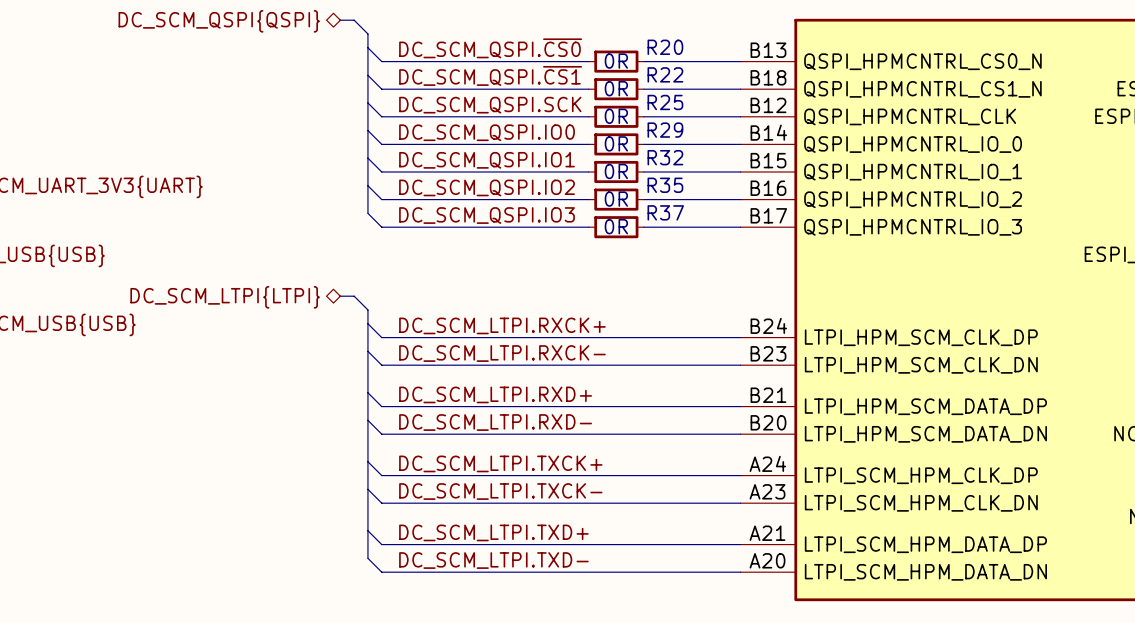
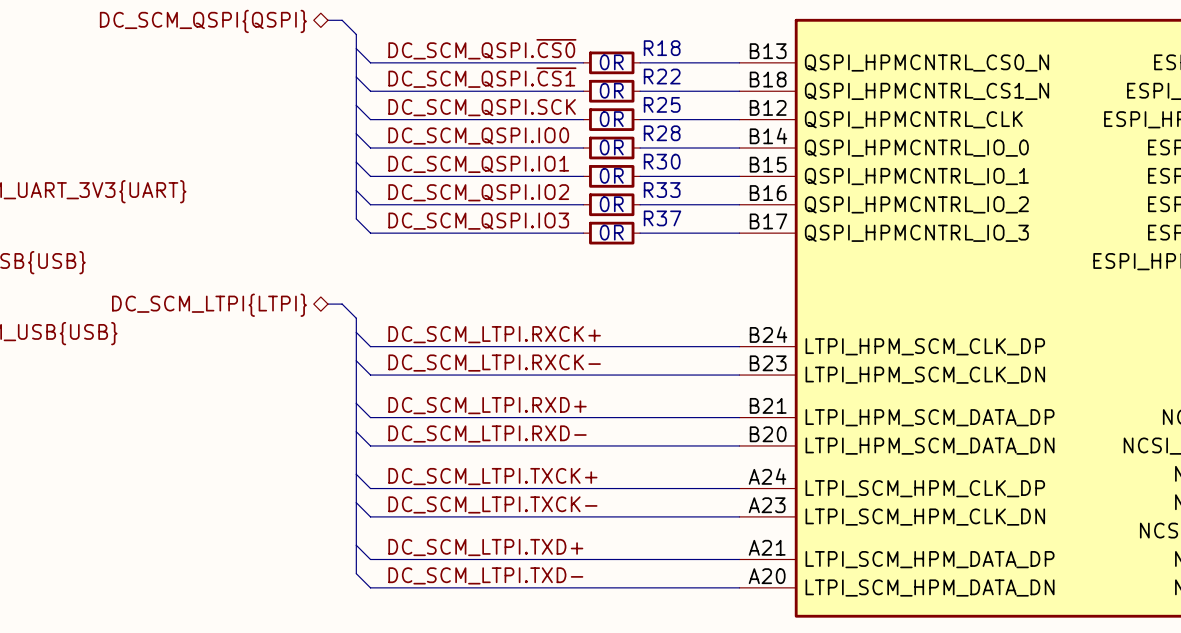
R20 name: R20 (665, 47) -> R18 (662, 48)
R29 name: R29 (665, 130) -> R28 (662, 133)
R32 name: R32 (665, 157) -> R30 (662, 161)
R35 name: R35 (665, 185) -> R33 (662, 190)

